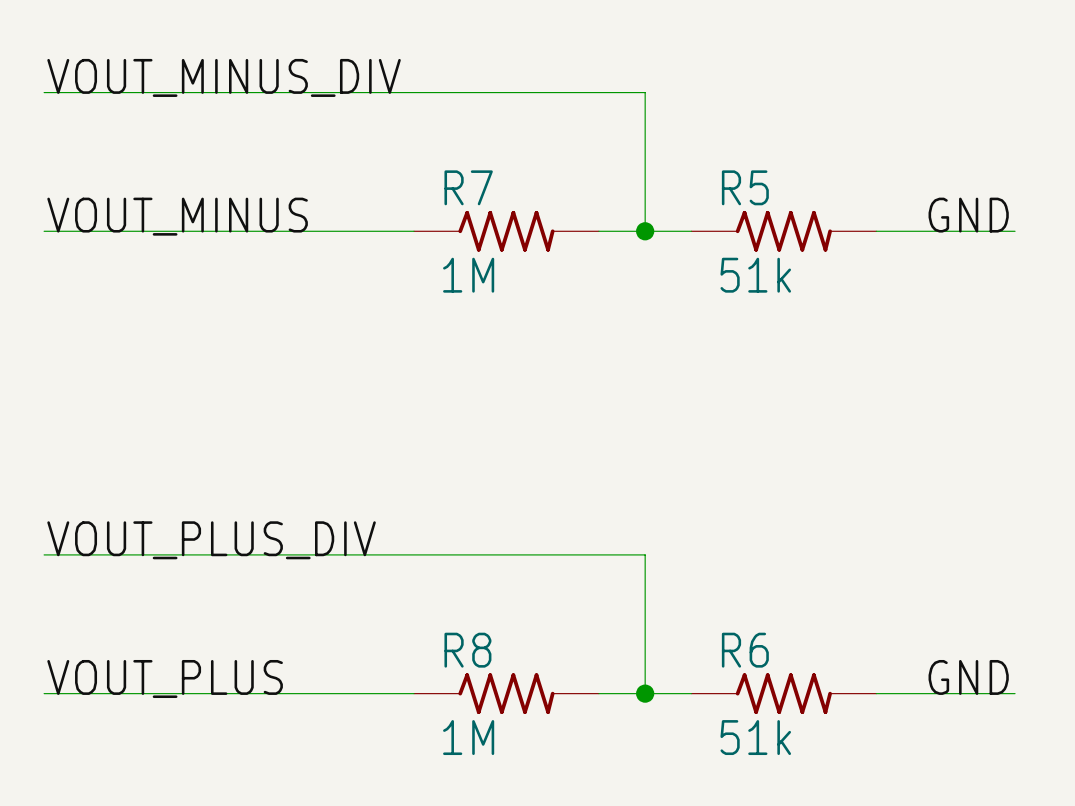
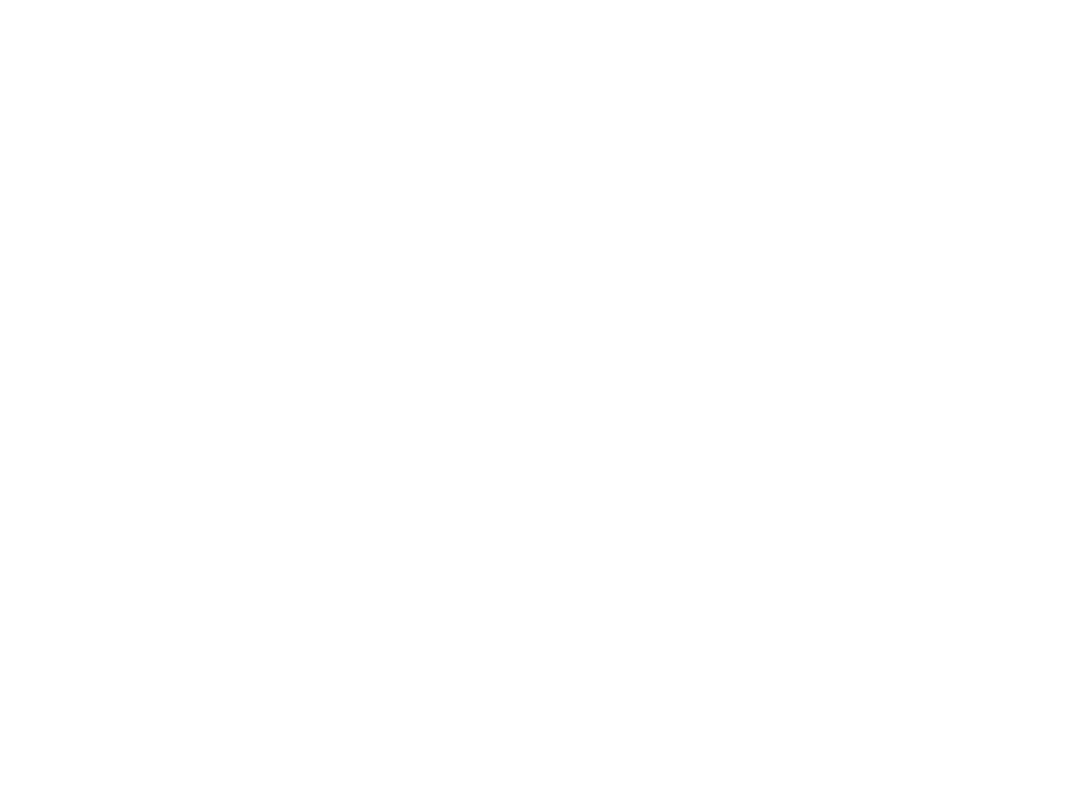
label: VOUT_MINUS_DIV (224, 77) -> none
wire: (44, 92) (645, 92) (645, 231) -> none
label: GND (968, 215) -> none
label: VOUT_MINUS (177, 216) -> none
wire: (44, 231) (413, 231) -> none
R7: 1M (506, 231) -> none
wire: (598, 231) (691, 231) -> none
junction: (645, 231) -> none
R5: 51k (783, 231) -> none
wire: (876, 231) (1015, 231) -> none
label: VOUT_PLUS_DIV (211, 540) -> none
wire: (44, 554) (645, 554) (645, 693) -> none
label: GND (968, 677) -> none
label: VOUT_PLUS (165, 678) -> none
wire: (44, 693) (413, 693) -> none
R8: 1M (506, 693) -> none
wire: (598, 693) (691, 693) -> none
junction: (645, 693) -> none
R6: 51k (783, 693) -> none
wire: (876, 693) (1015, 693) -> none

